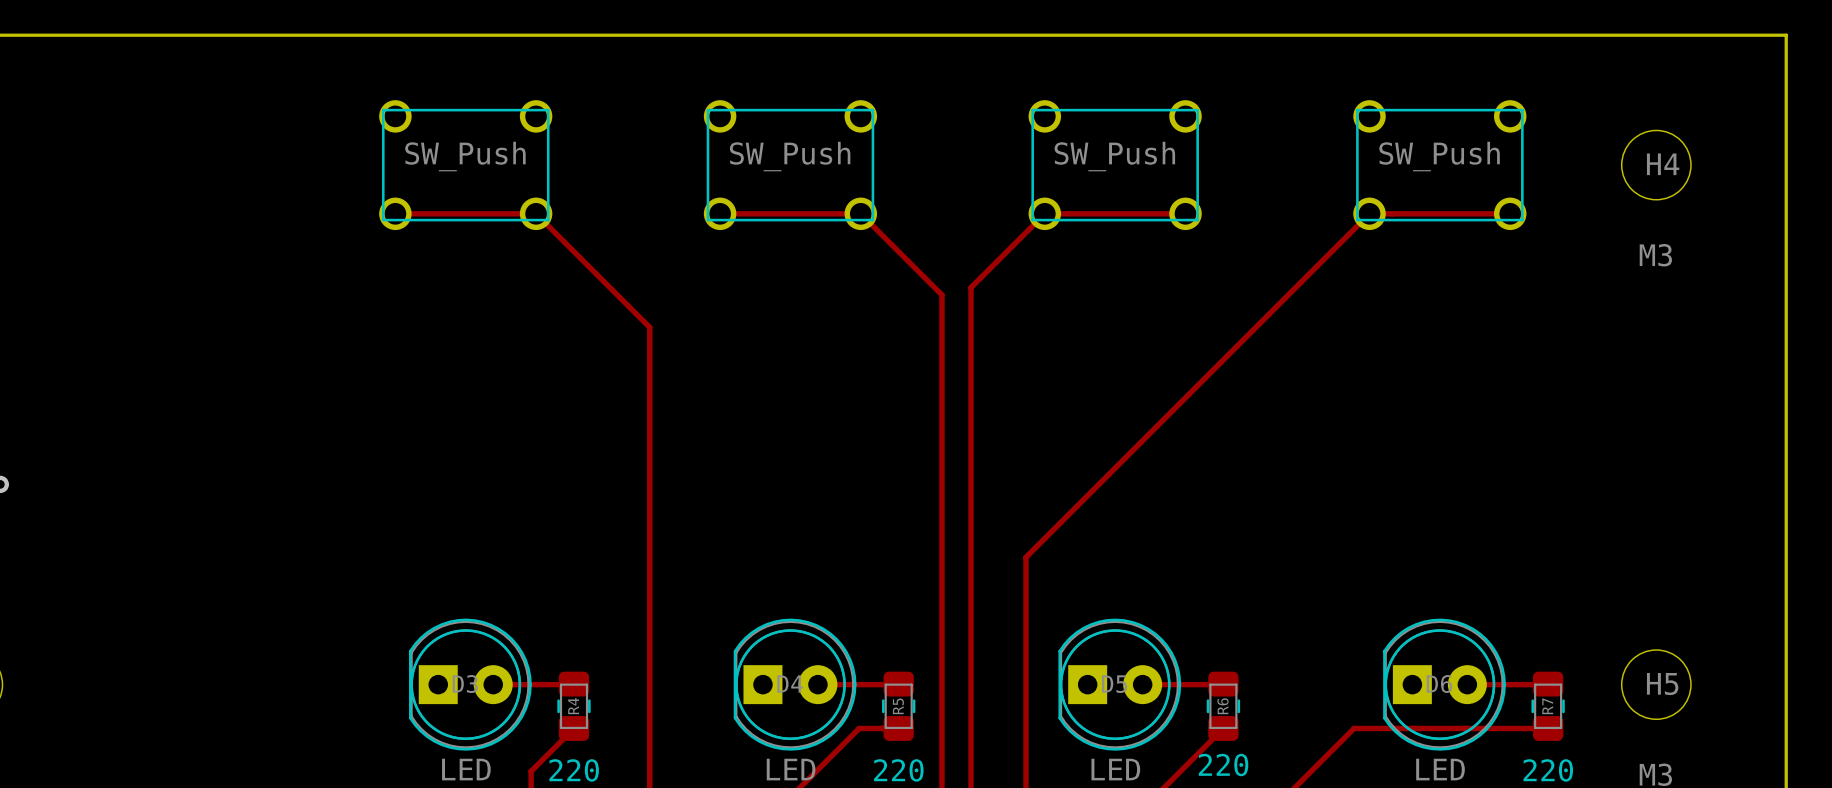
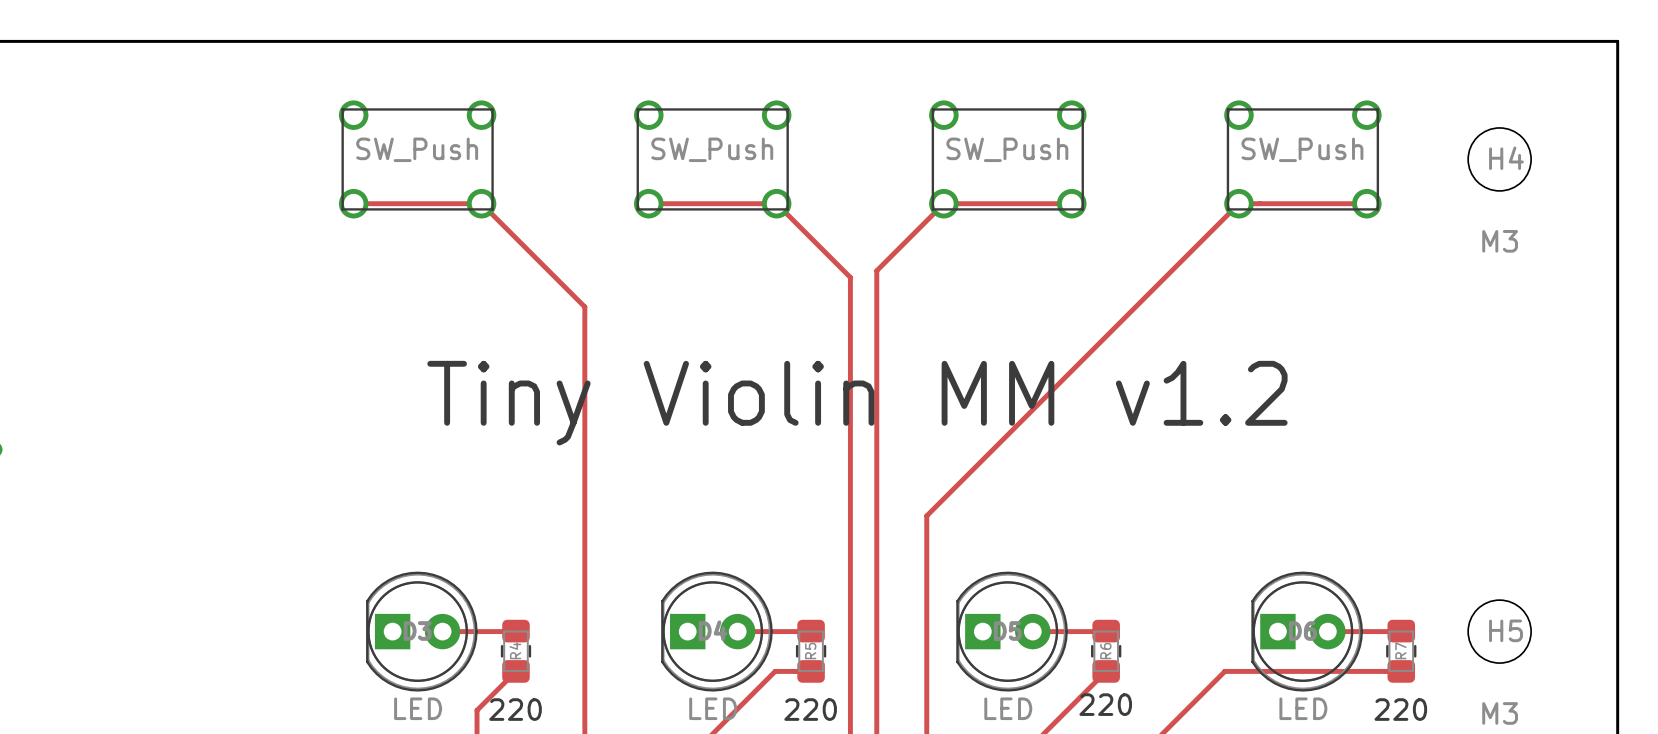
text: none -> Tiny Violin MM v1.2 (857, 403)

